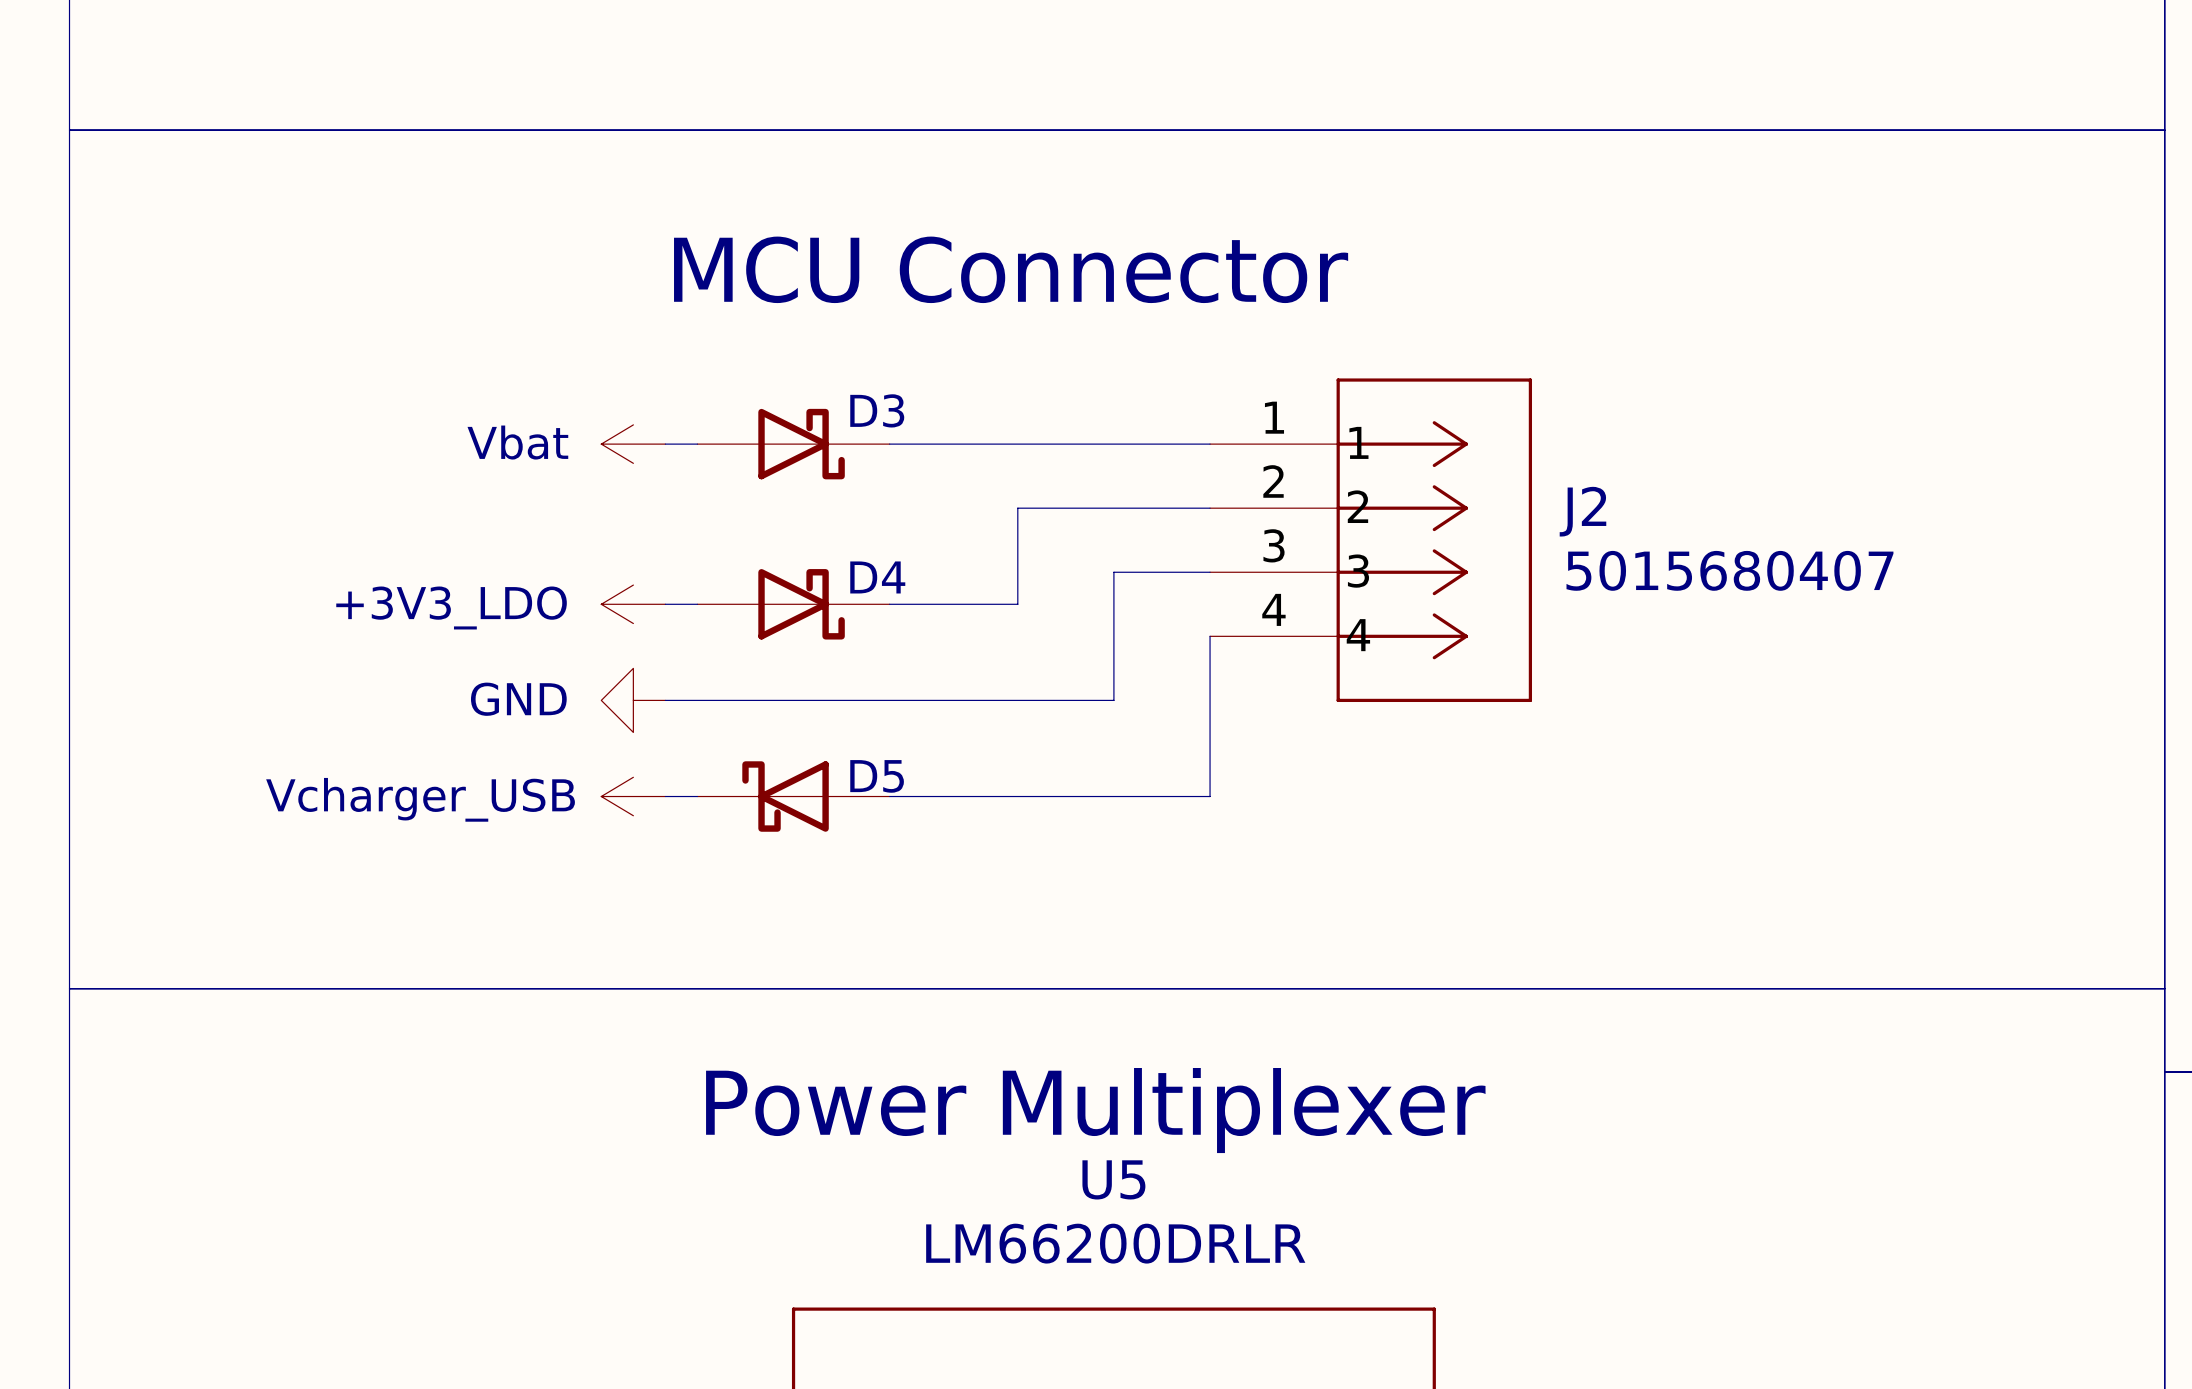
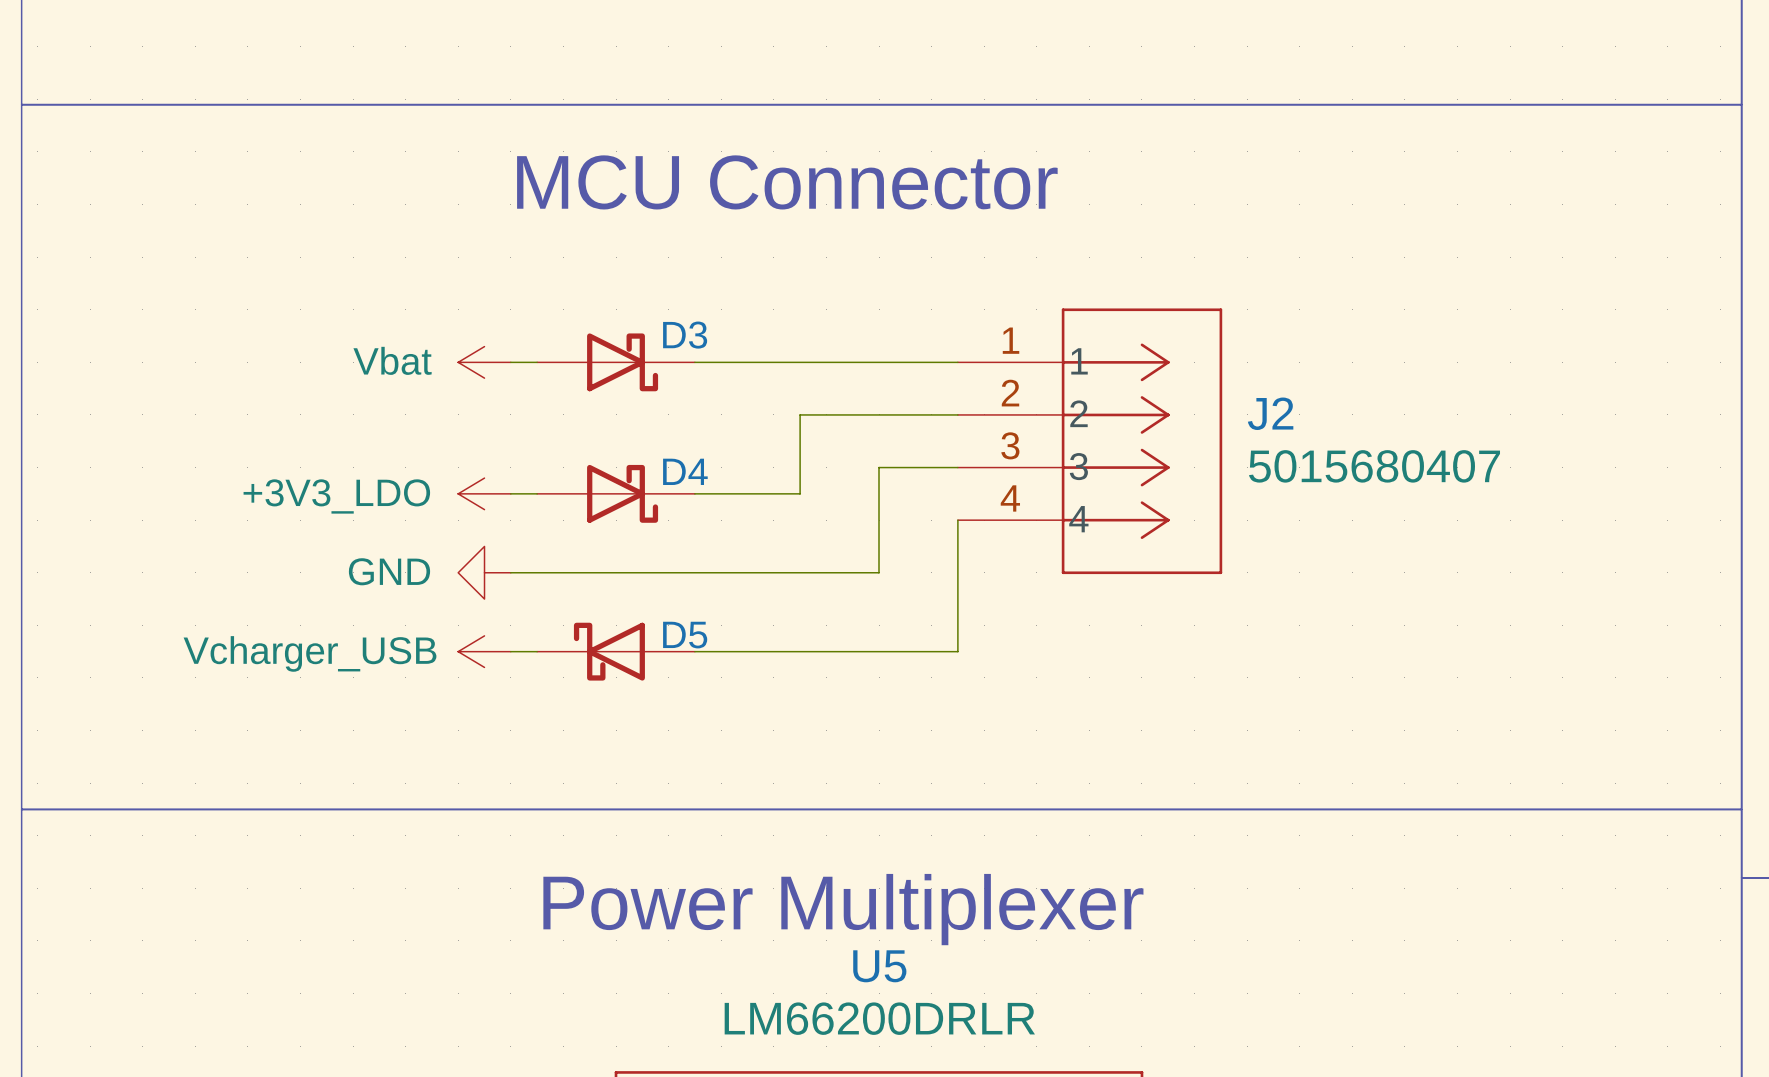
text position: MCU Connector (1011, 269) -> MCU Connector (787, 182)

